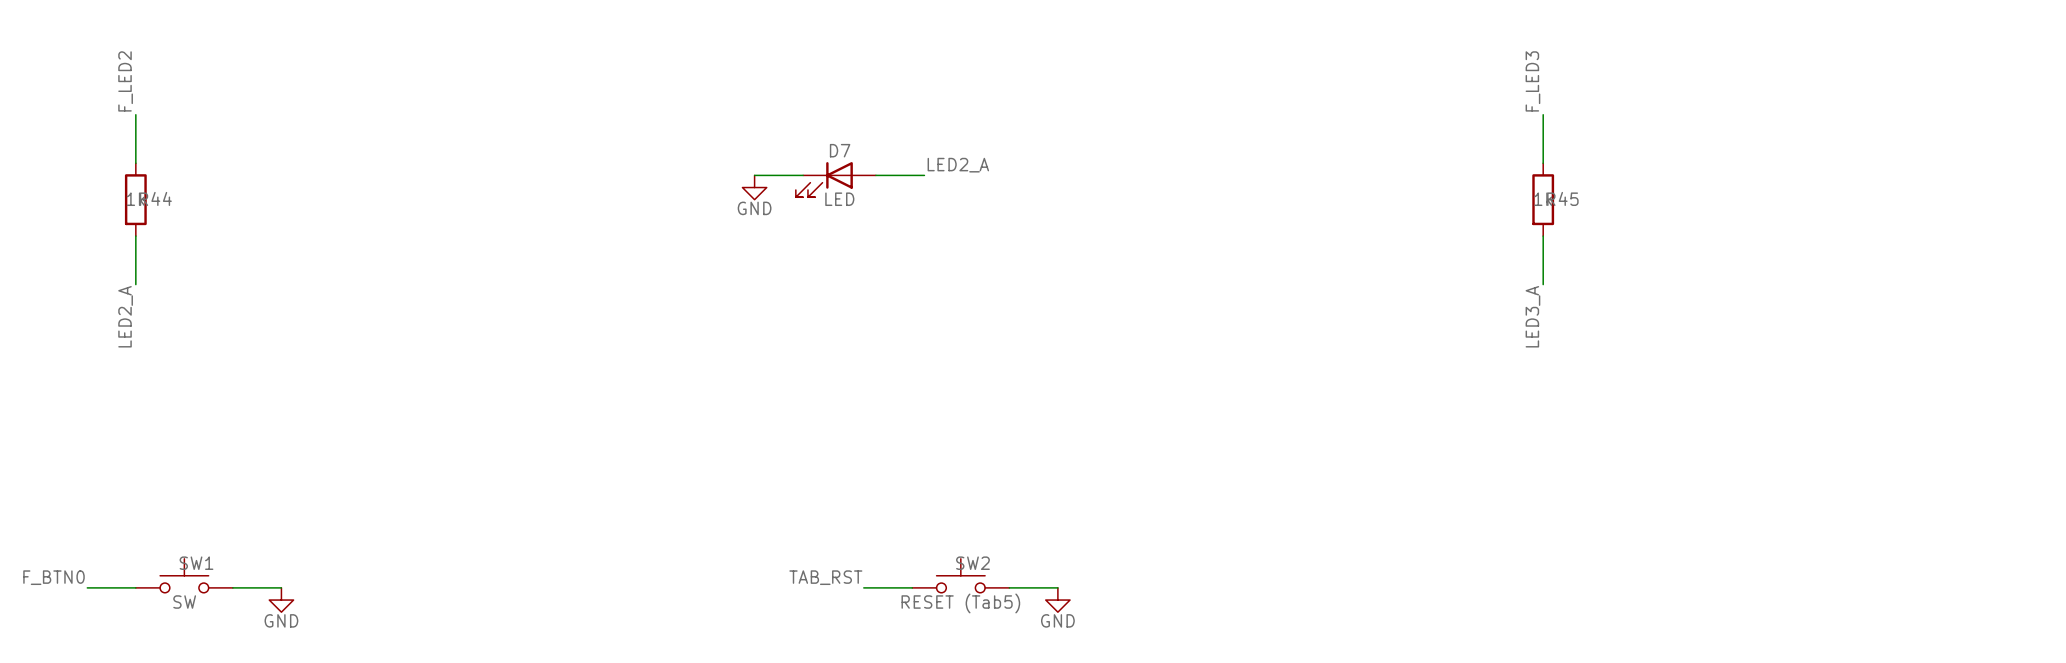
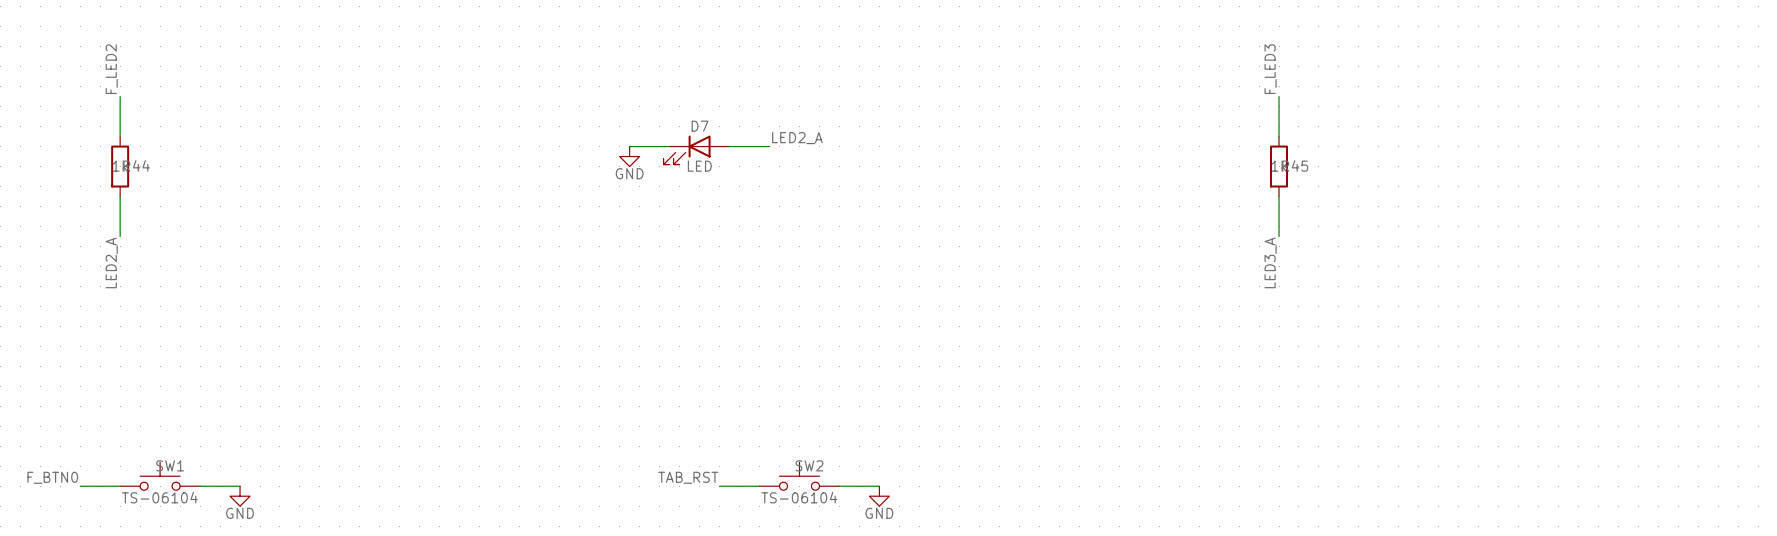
SW1 value: SW (184, 602) -> TS-06104 (159, 497)
SW2 value: RESET (Tab5) (960, 603) -> TS-06104 (799, 497)

